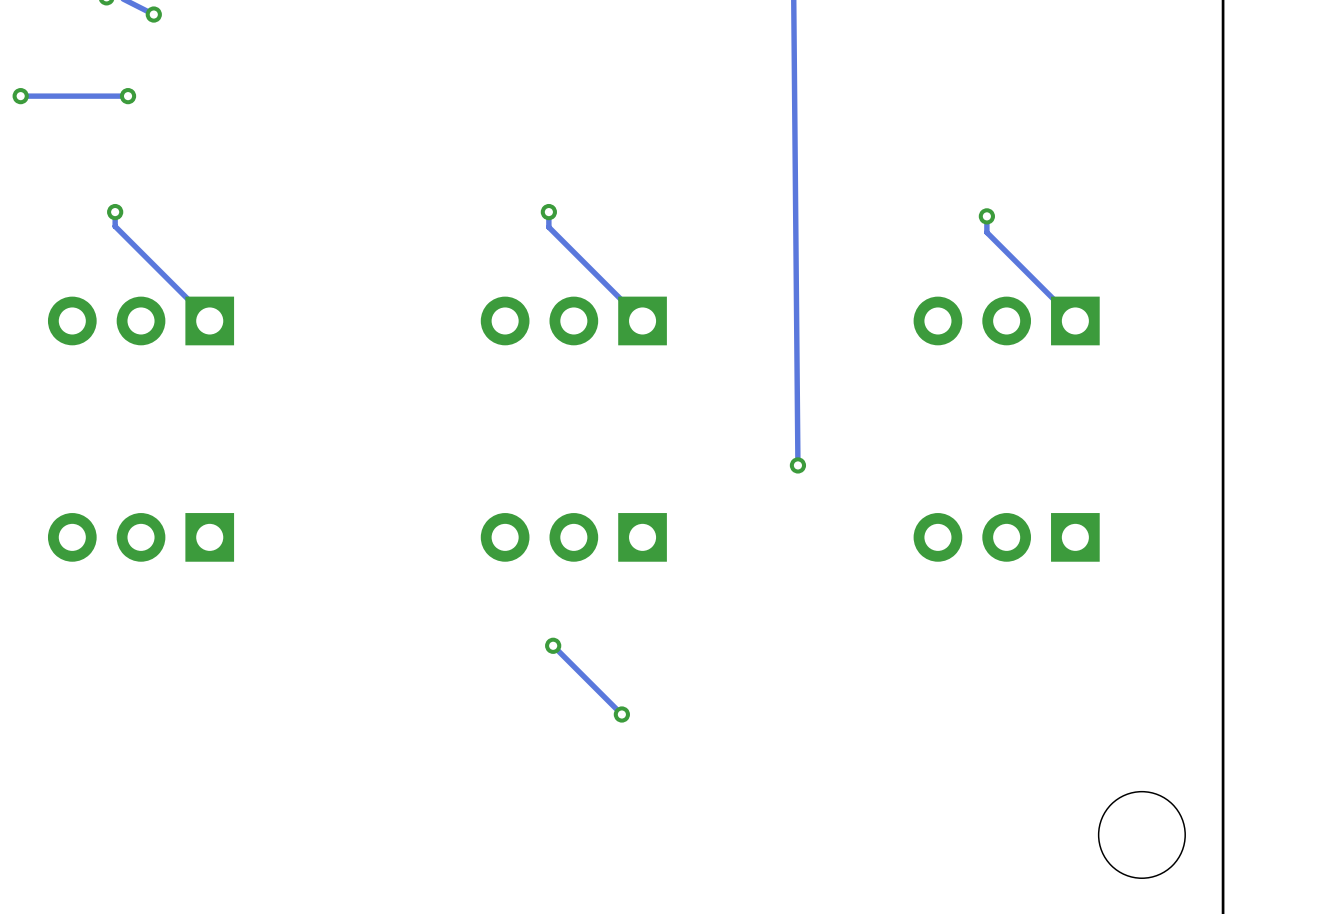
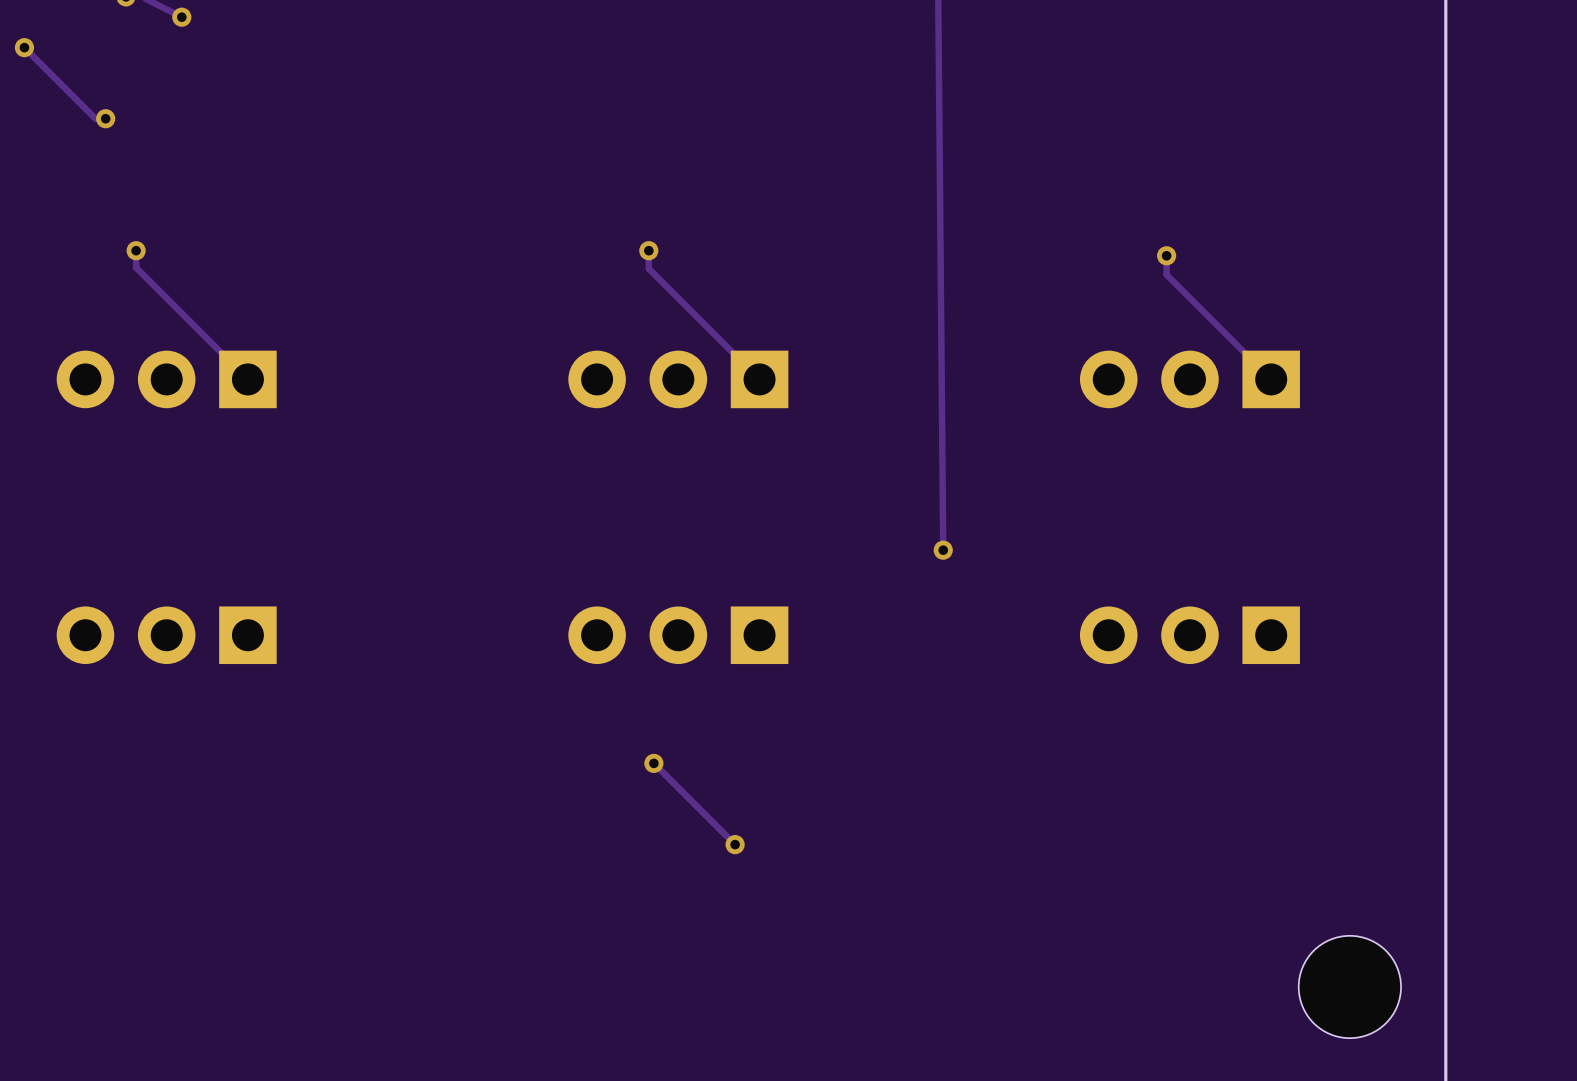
track: none -> (24, 47) (95, 118) (105, 118)
via: none -> (24, 47)
via: (20, 96) -> none
track: (128, 96) (20, 96) -> none
via: (128, 96) -> none
via: none -> (105, 118)

